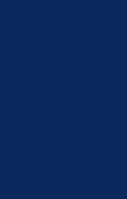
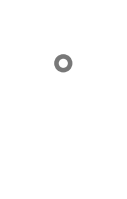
via: none -> (63, 63)

